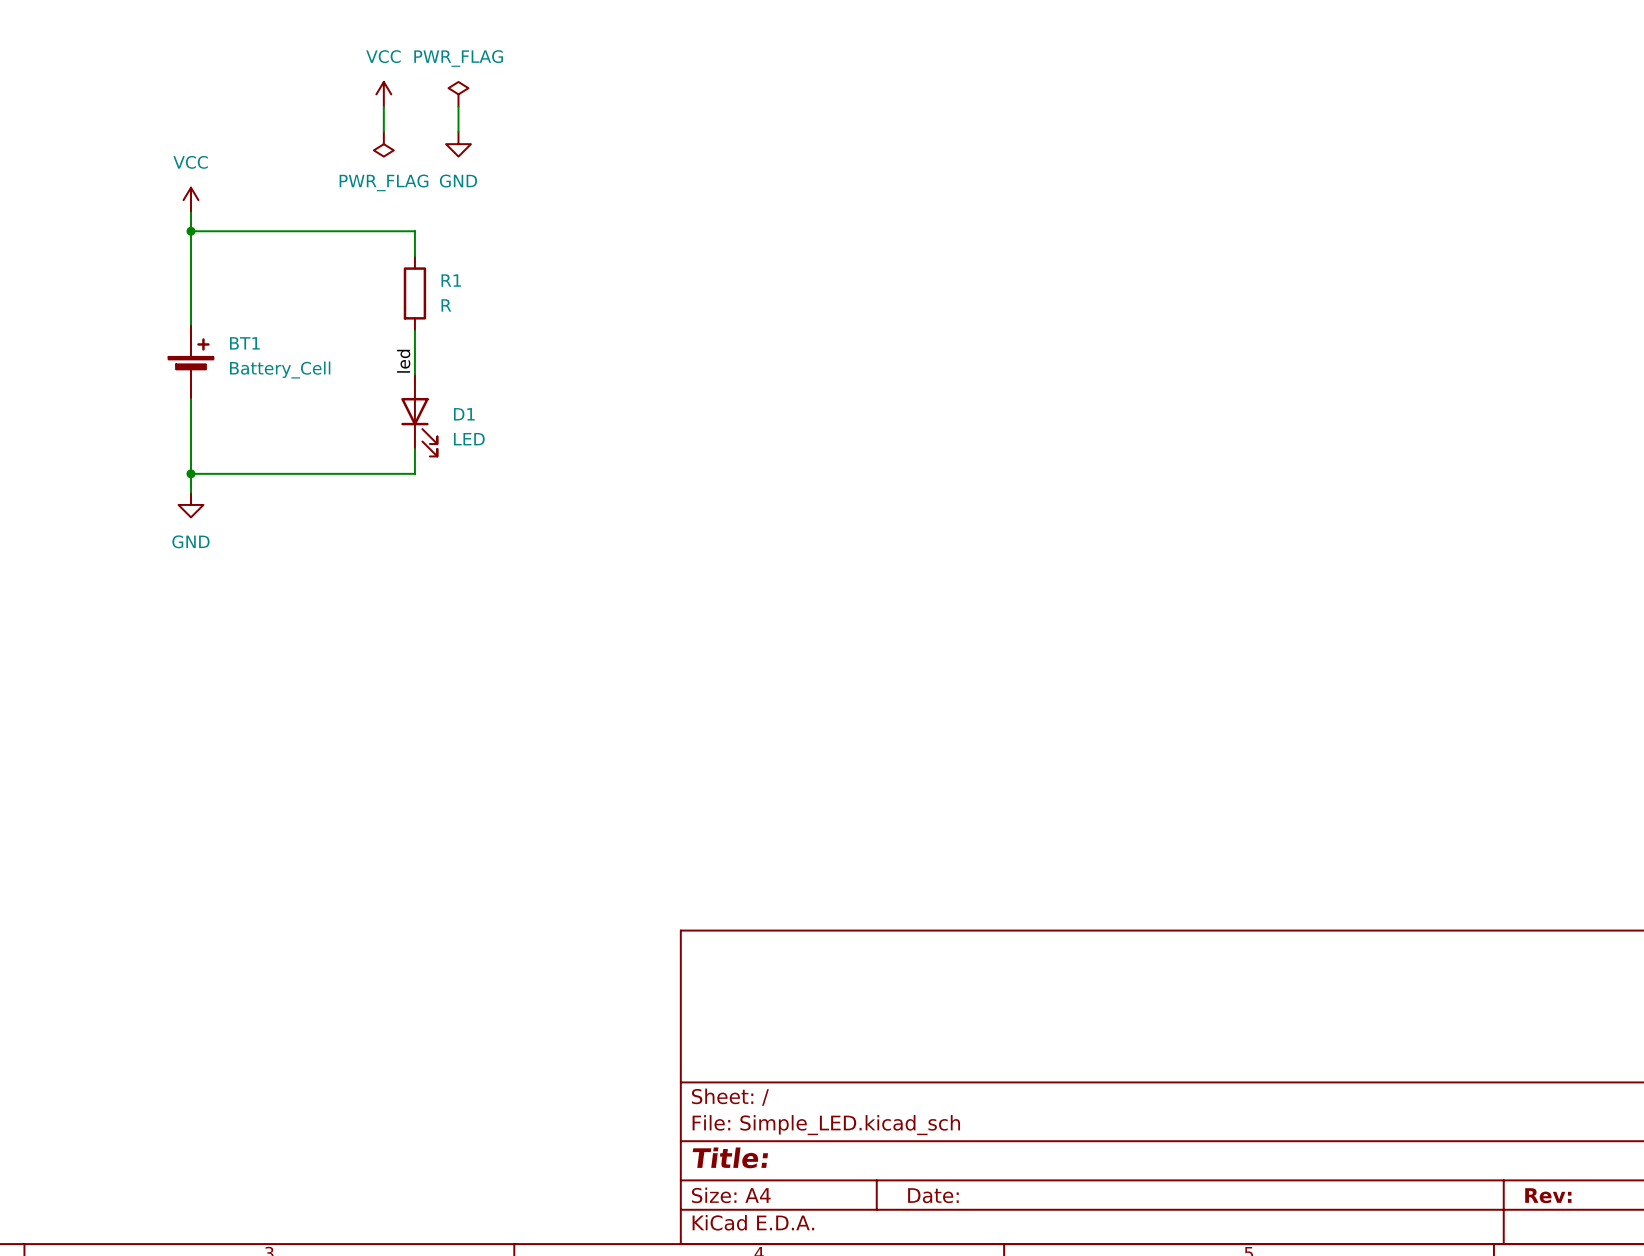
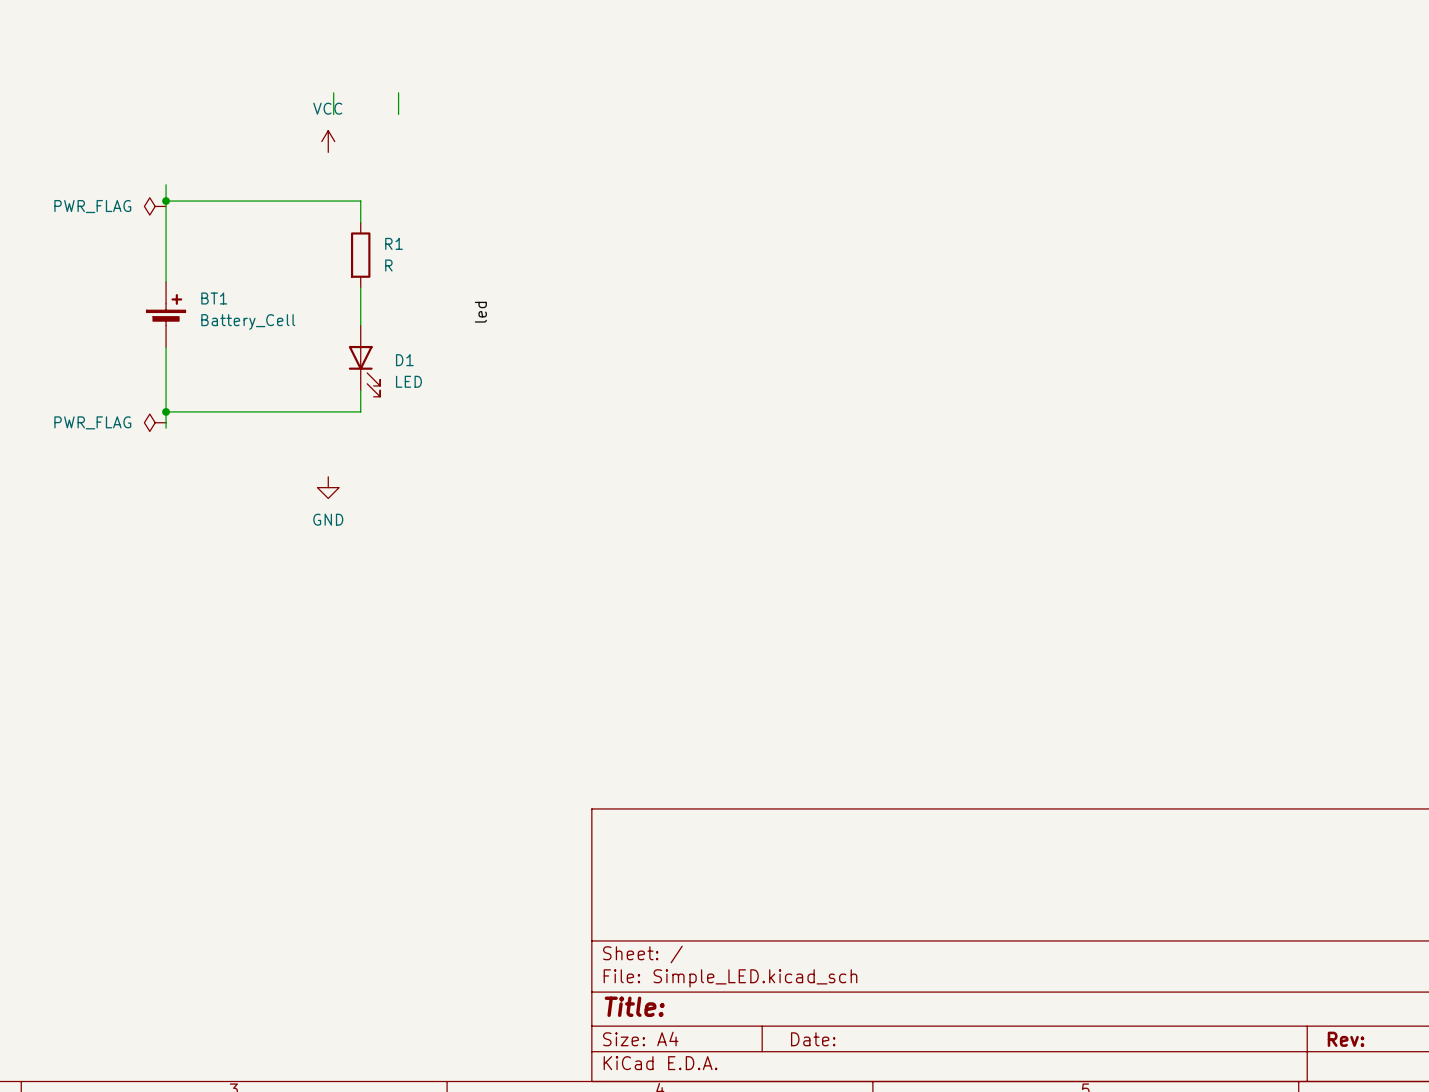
power symbol position: VCC (383, 94) -> VCC (328, 141)
power symbol: PWR_FLAG (458, 94) -> none
power symbol: PWR_FLAG (383, 144) -> none
power symbol: GND (458, 144) -> none
power symbol: VCC (190, 200) -> none
power symbol: none -> PWR_FLAG (155, 206)
label position: led (403, 361) -> led (480, 312)
power symbol: none -> PWR_FLAG (155, 422)
power symbol position: GND (190, 504) -> GND (328, 487)

